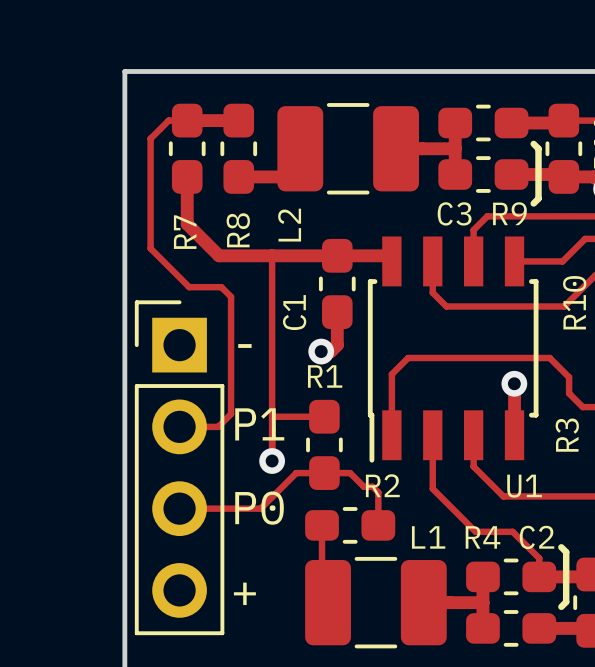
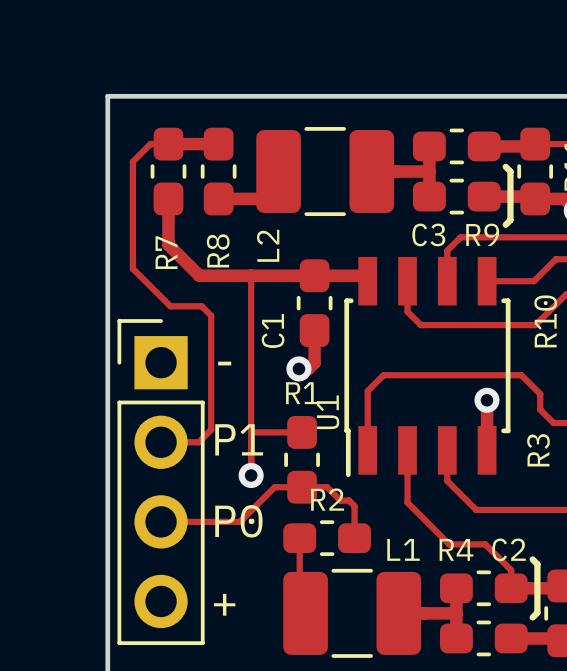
R2 name position: R2 (382, 485) -> R2 (327, 499)
U1 name rotation: 0° (524, 486) -> 90° counterclockwise (328, 412)
U1 name position: U1 (524, 486) -> U1 (328, 412)

